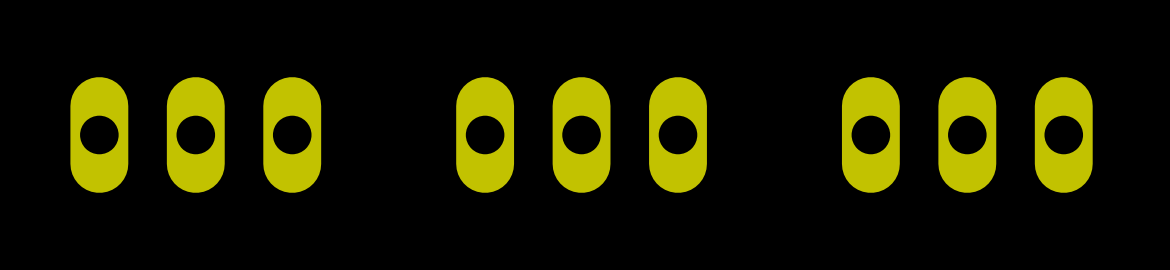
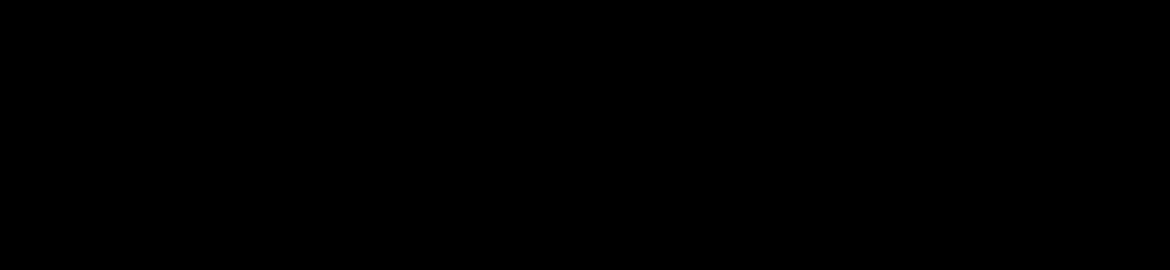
part: (195, 134) -> none
part: (581, 134) -> none
part: (967, 134) -> none

